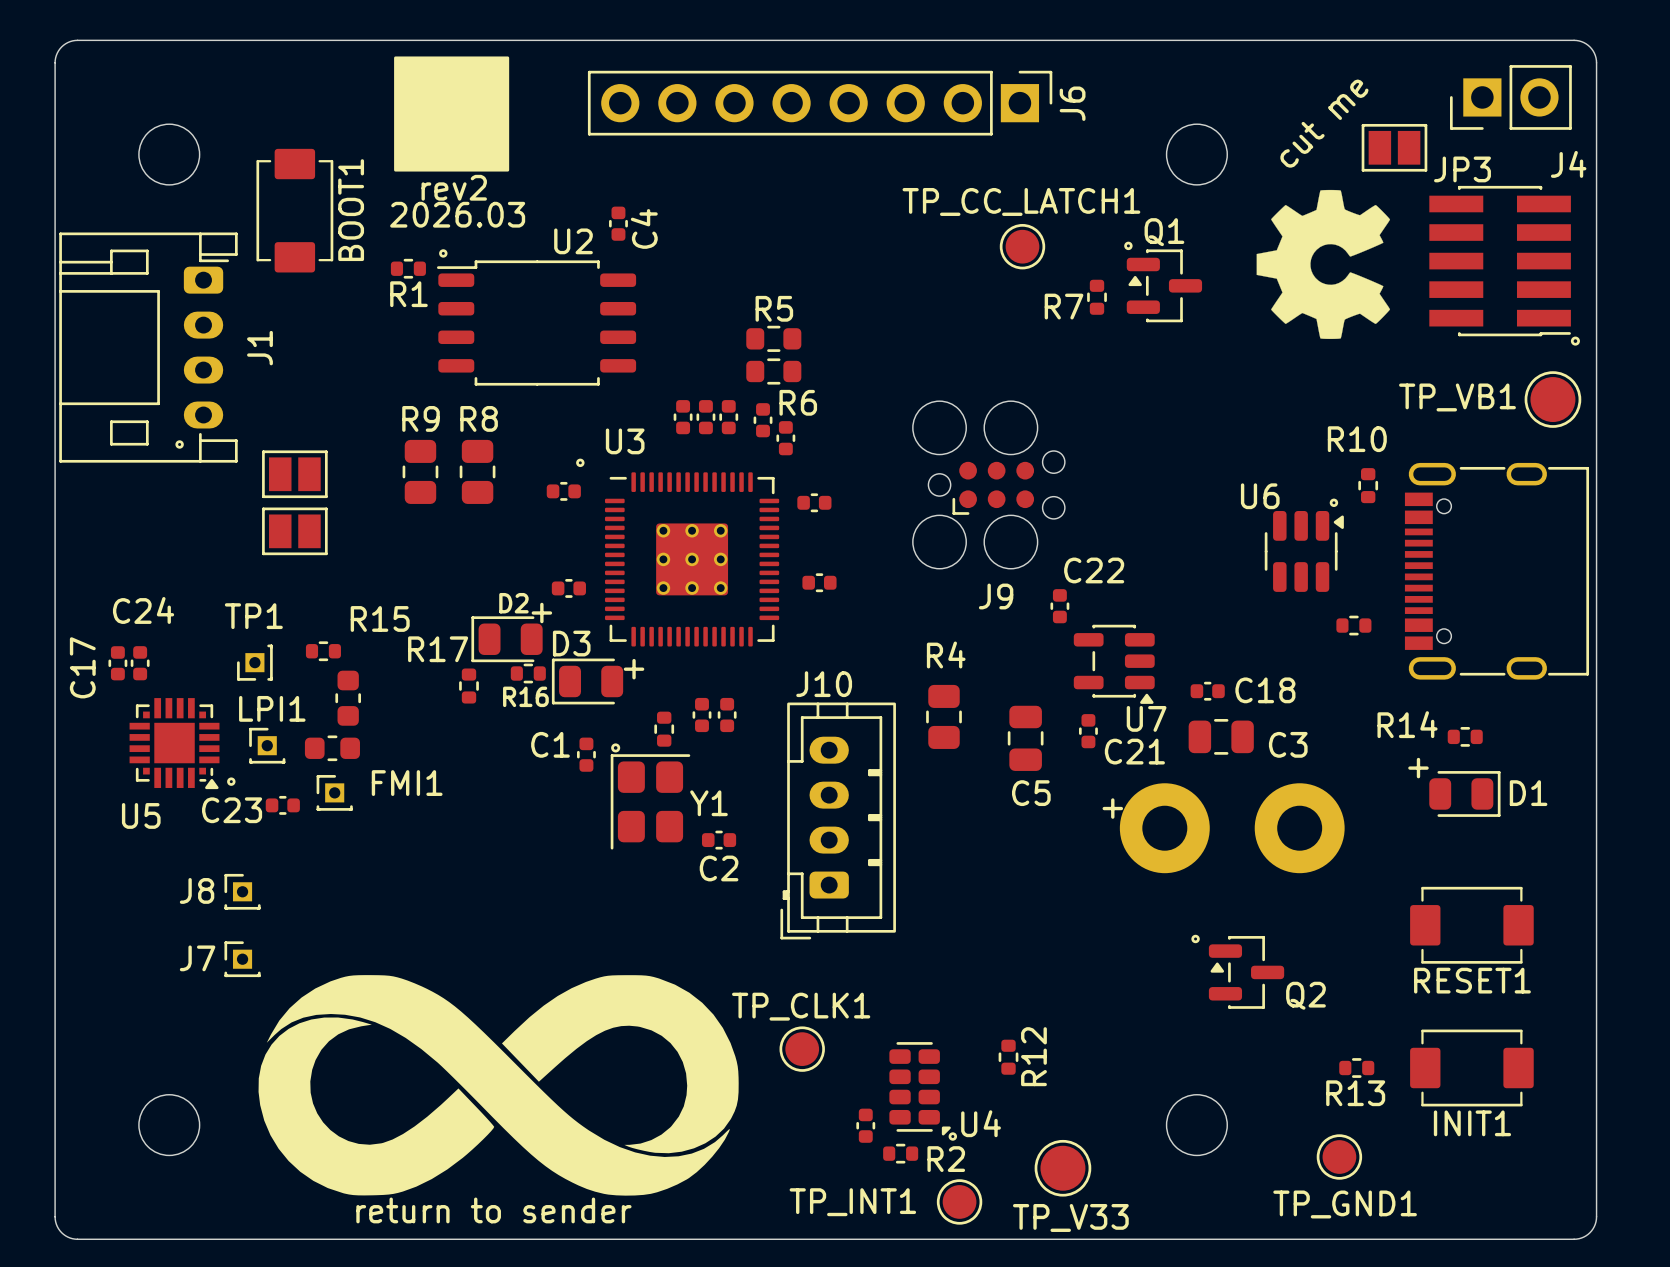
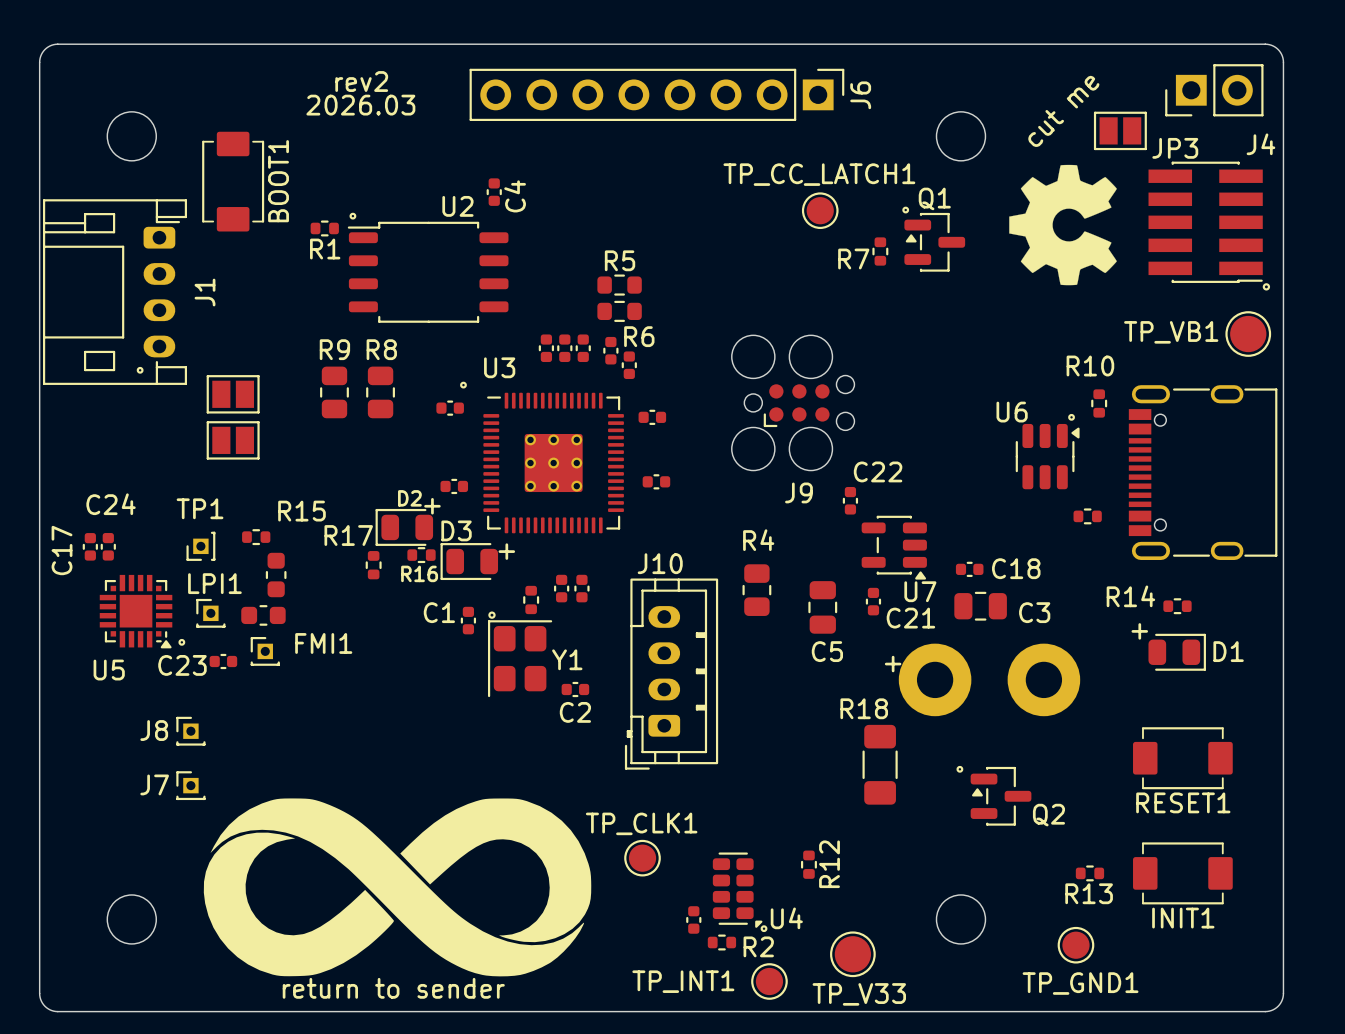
drawing: [394, 56, 510, 172] -> none
text position: rev2 (454, 187) -> rev2 (361, 81)
text position: 2026.03 (457, 214) -> 2026.03 (360, 105)
R18: none -> (880, 764)

